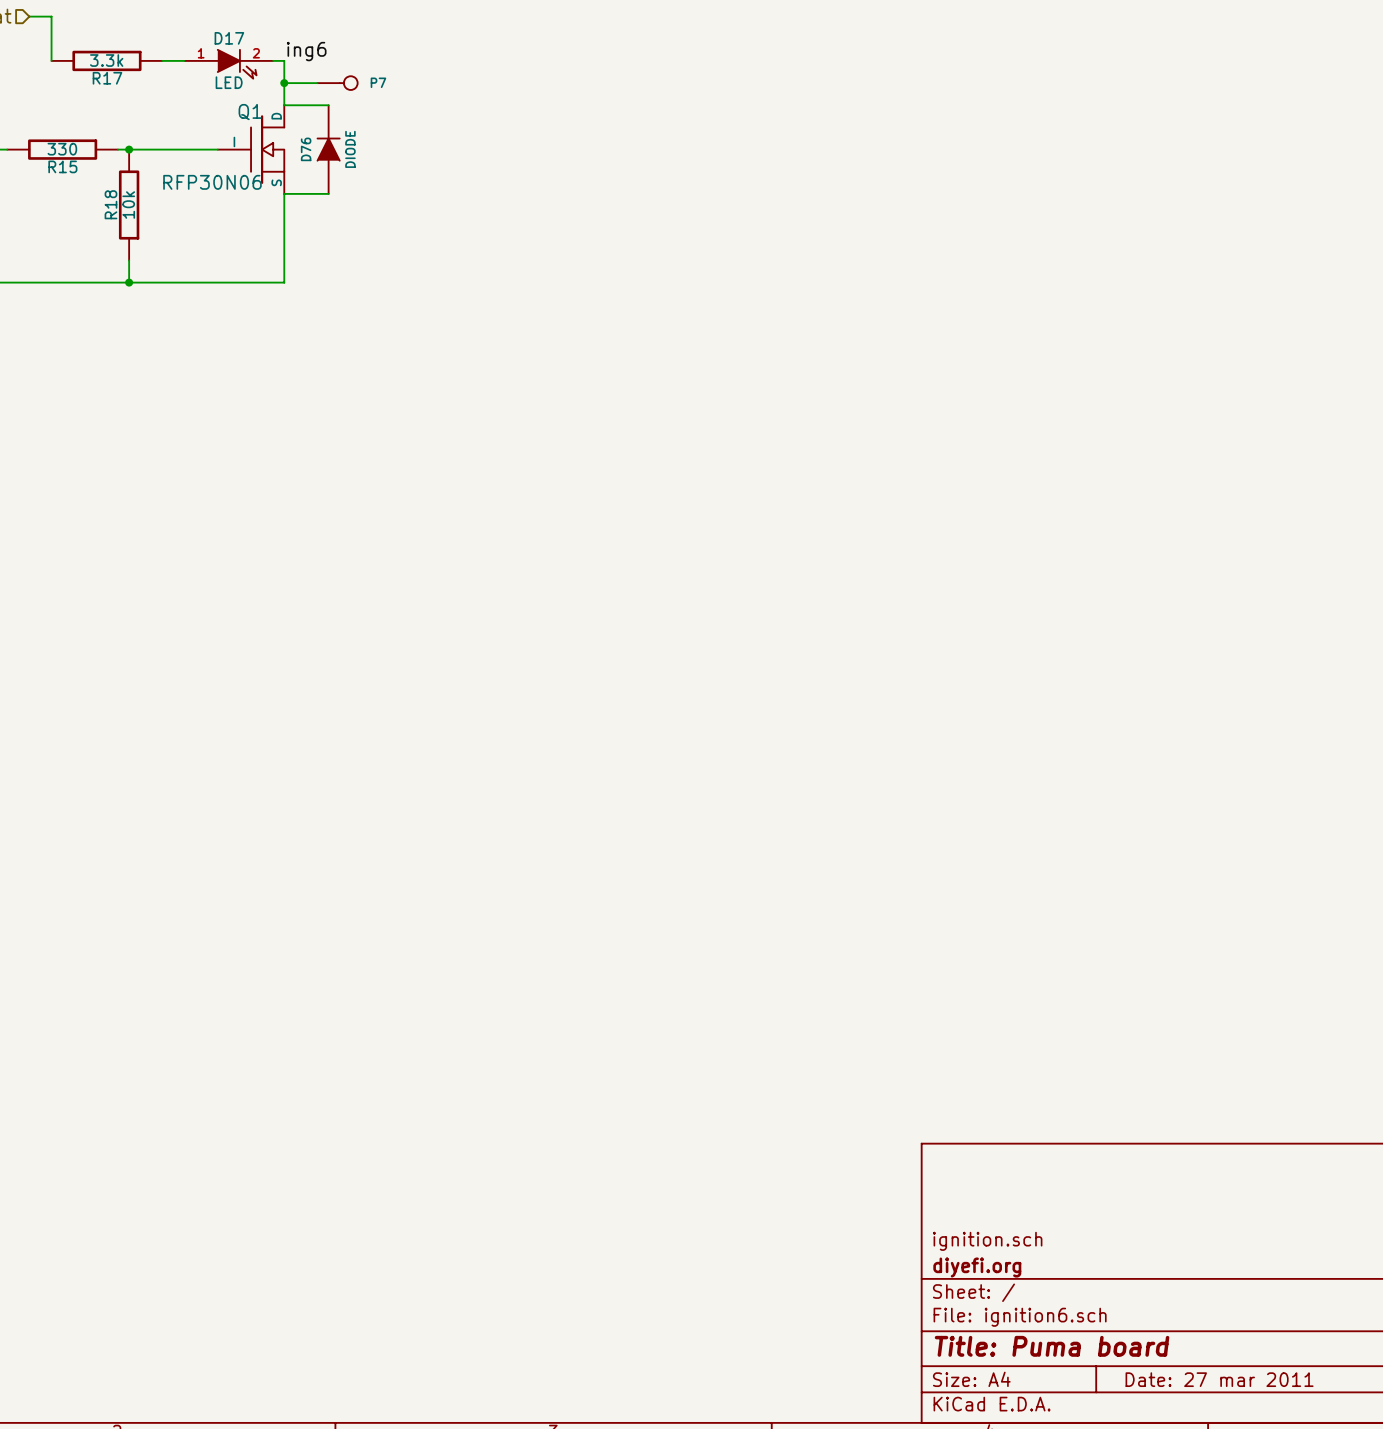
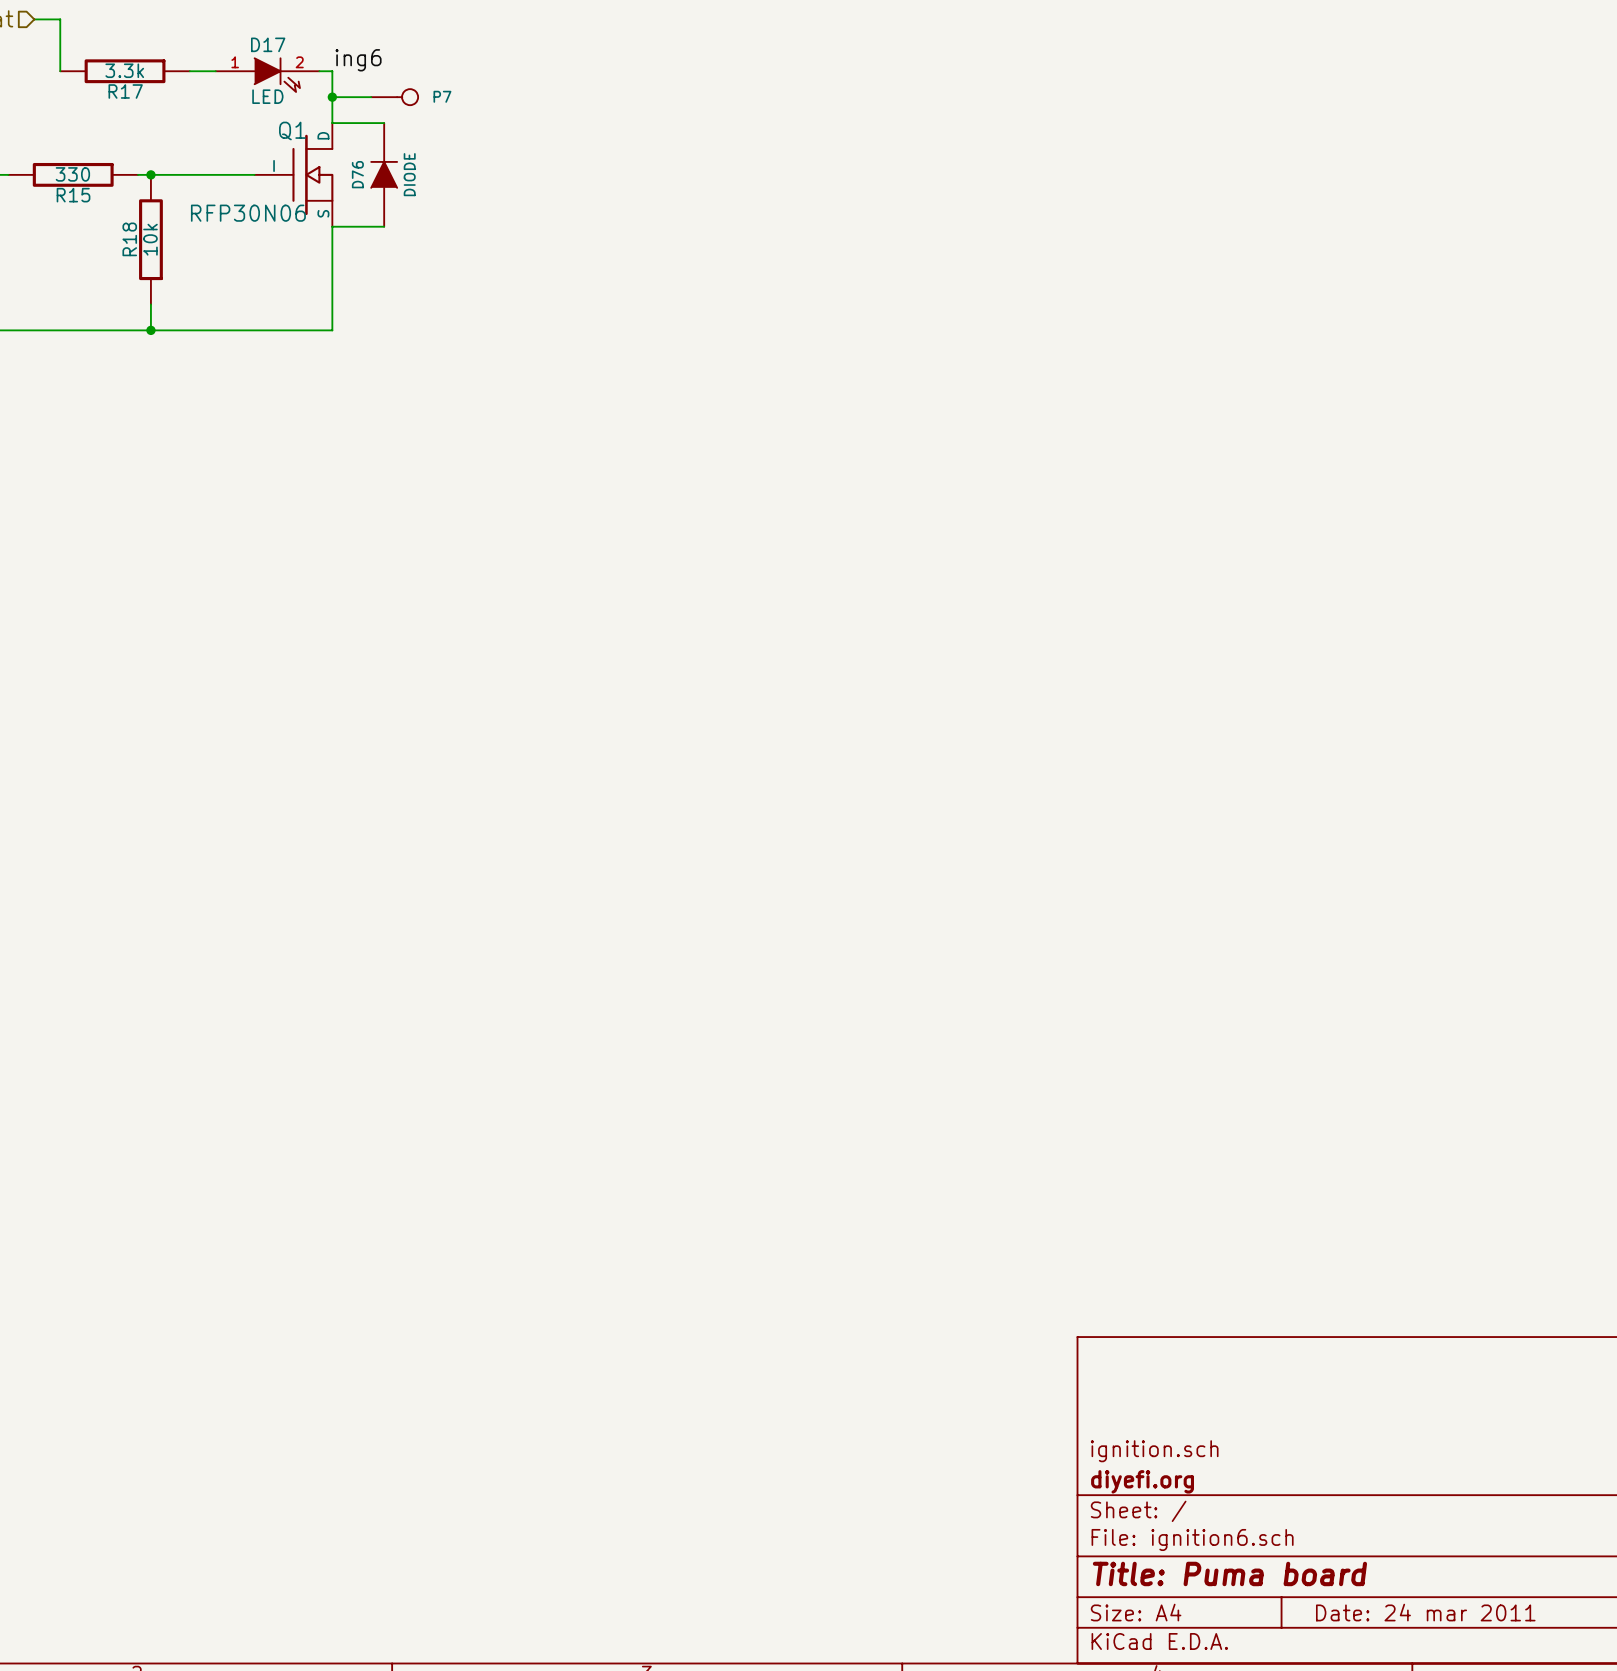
title block: Date: 27 mar 2011 (1219, 1379) -> Date: 24 mar 2011 (1425, 1612)

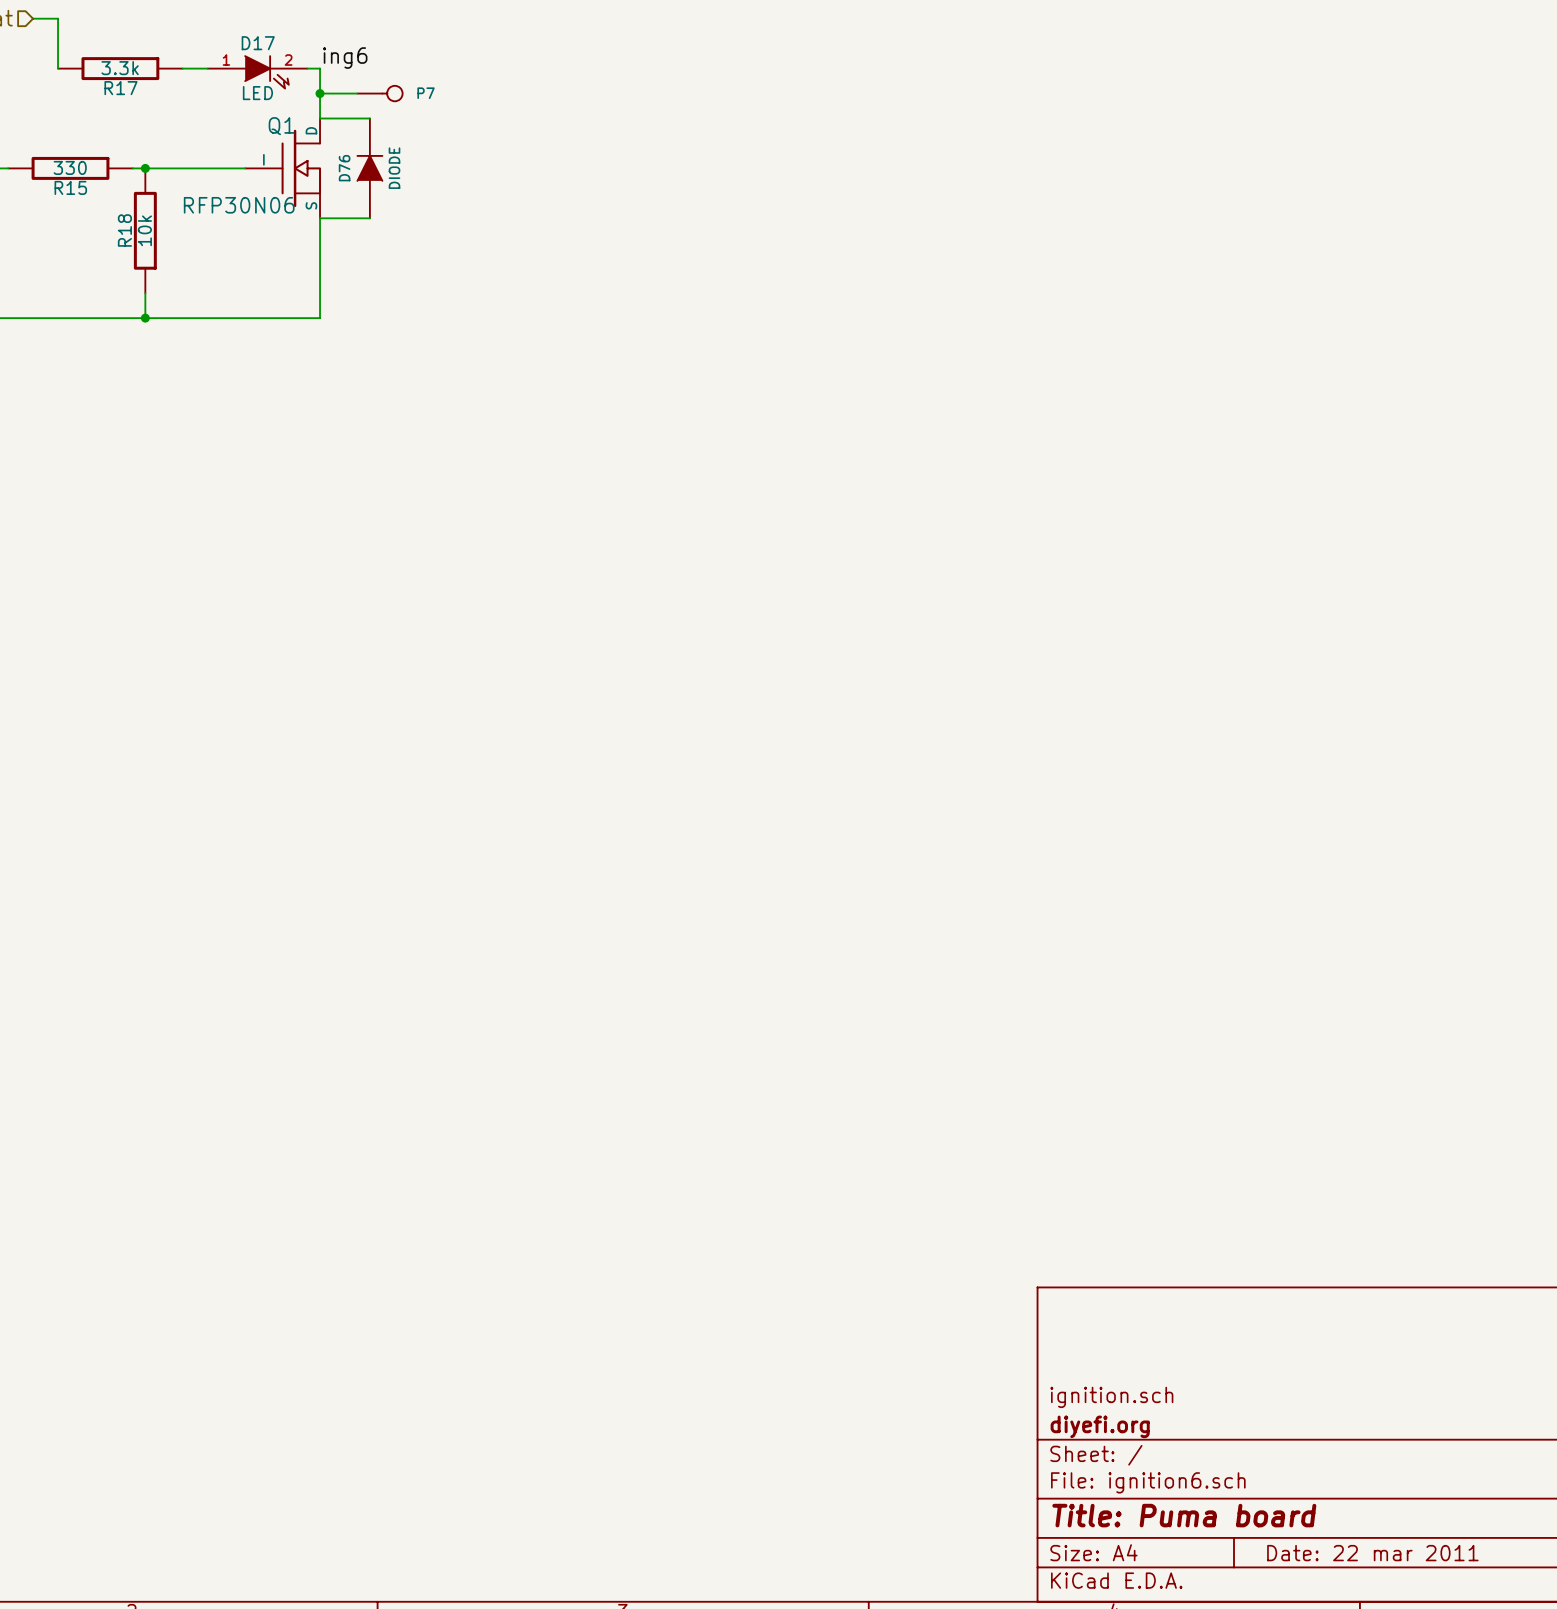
title block: Date: 24 mar 2011 (1425, 1612) -> Date: 22 mar 2011 (1372, 1553)

